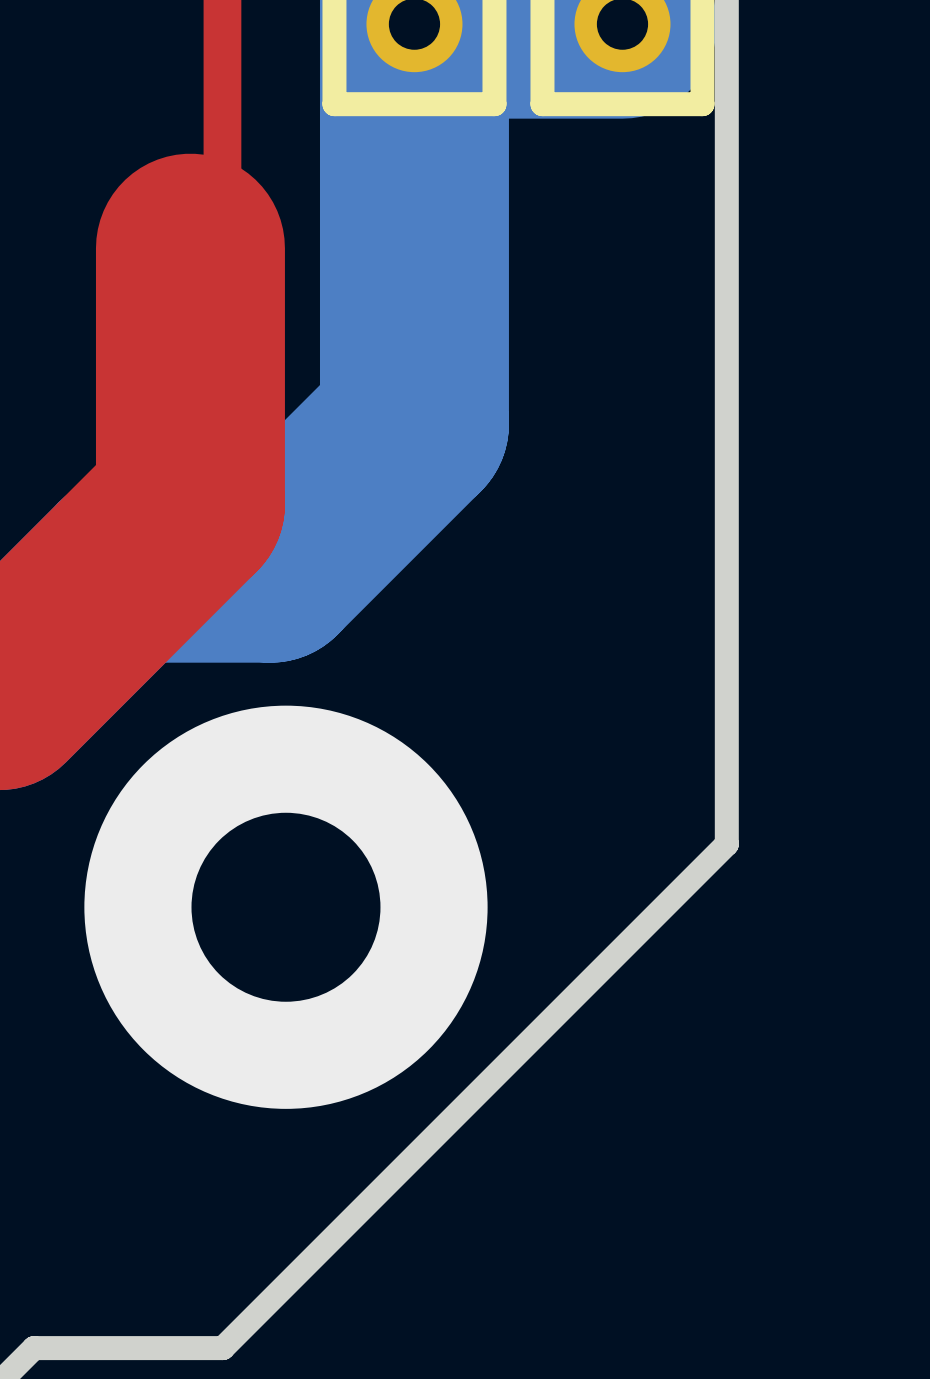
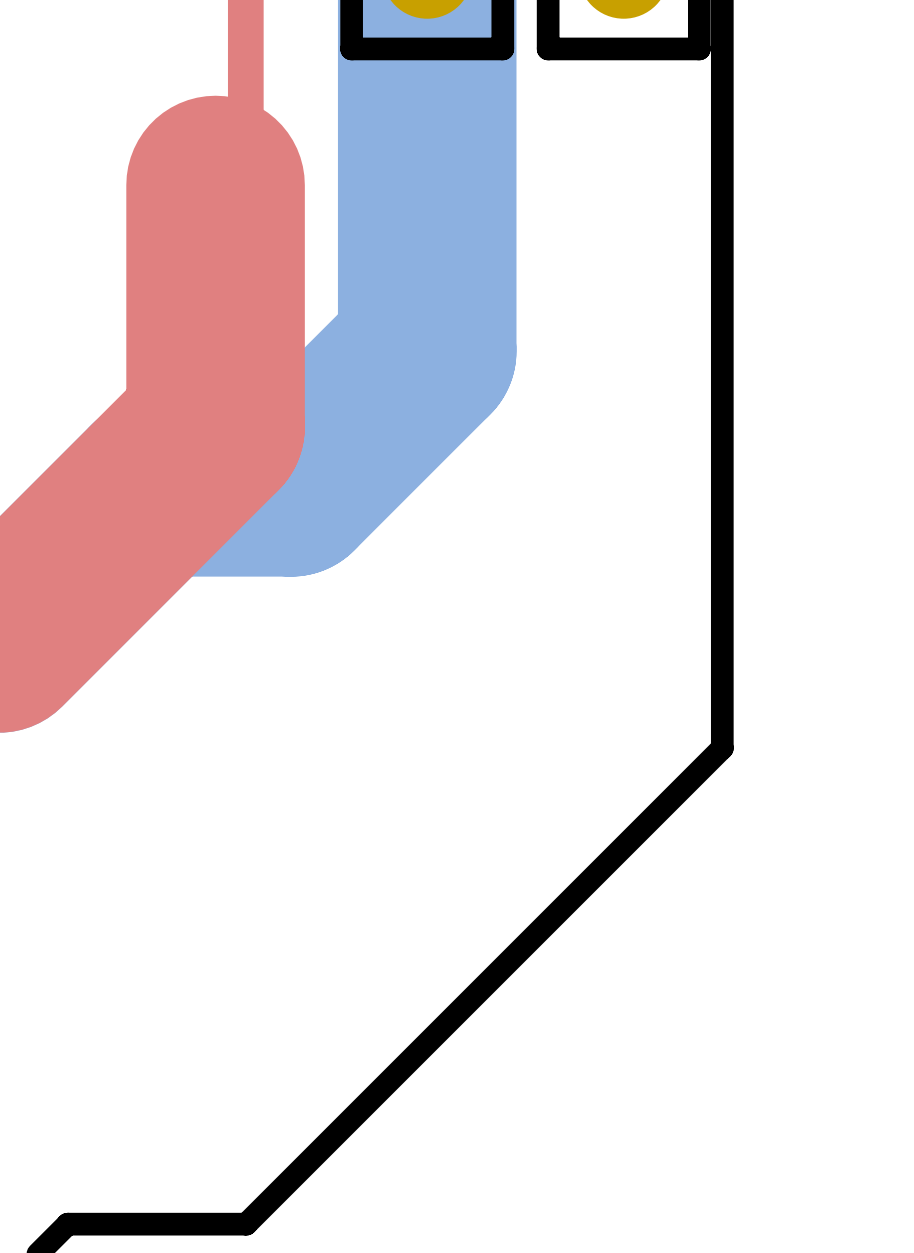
via: (285, 907) -> none

